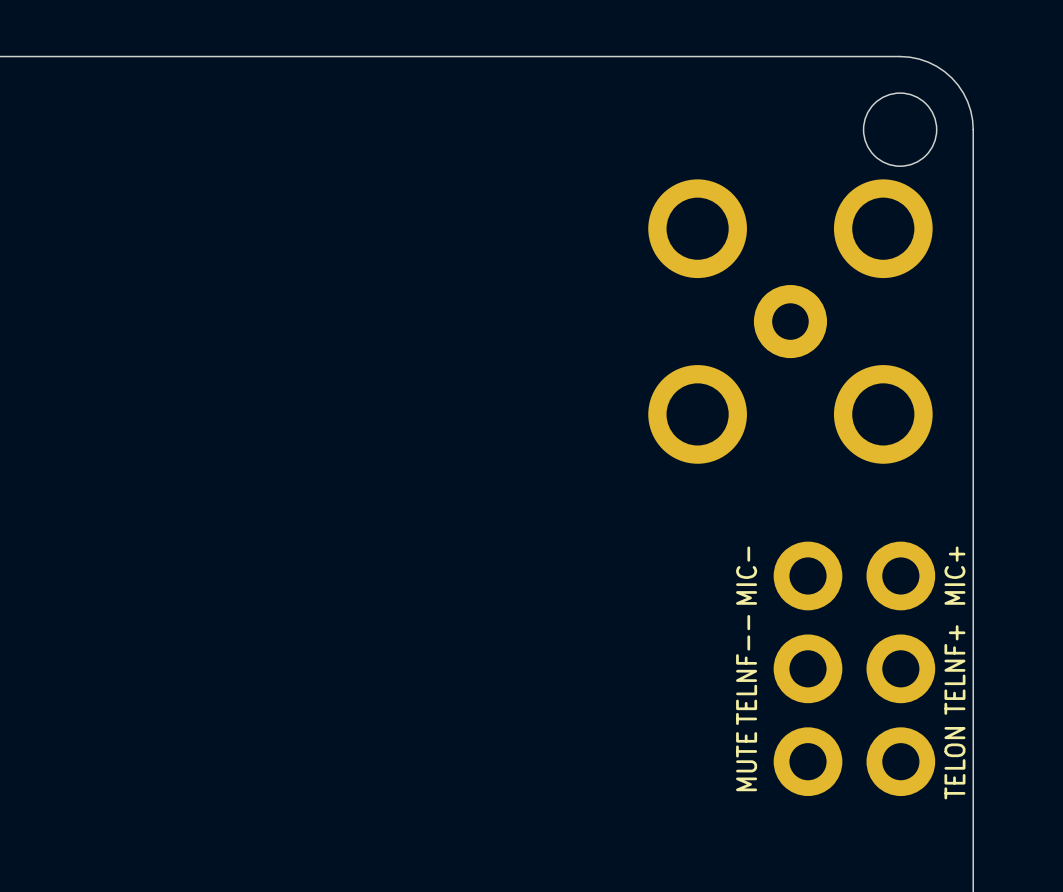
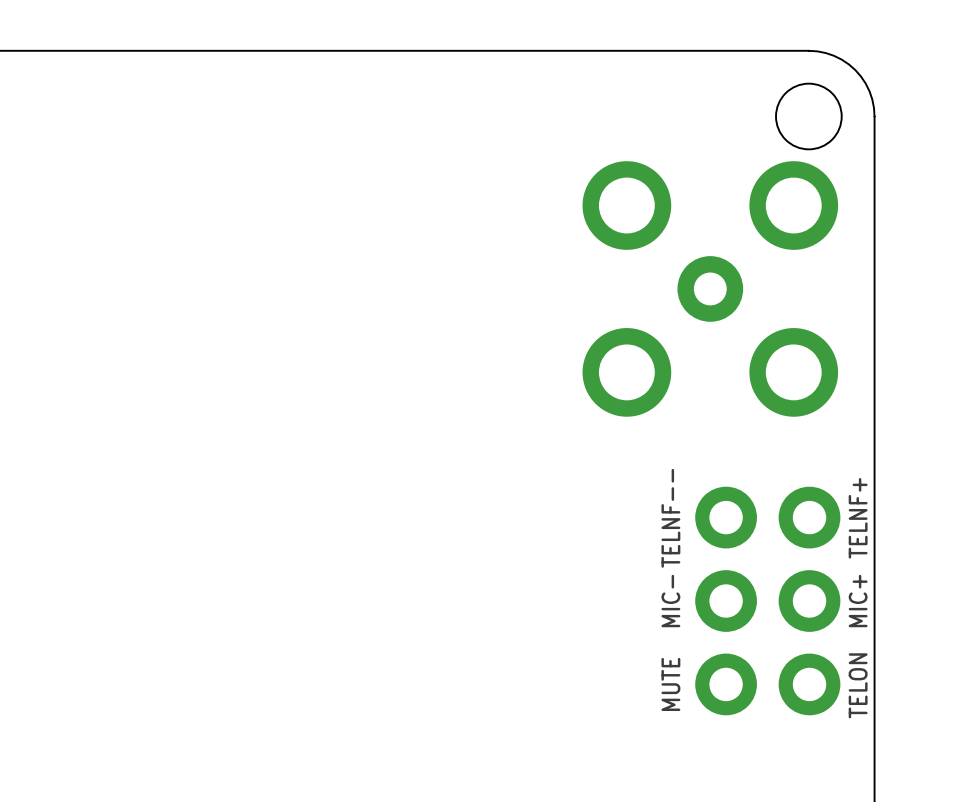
text: MIC- (746, 575) -> TELNF-- (670, 518)
text: MIC+ (954, 575) -> TELNF+ (858, 518)
text: TELNF-- (746, 670) -> MIC- (670, 601)
text: TELNF+ (954, 670) -> MIC+ (858, 601)

